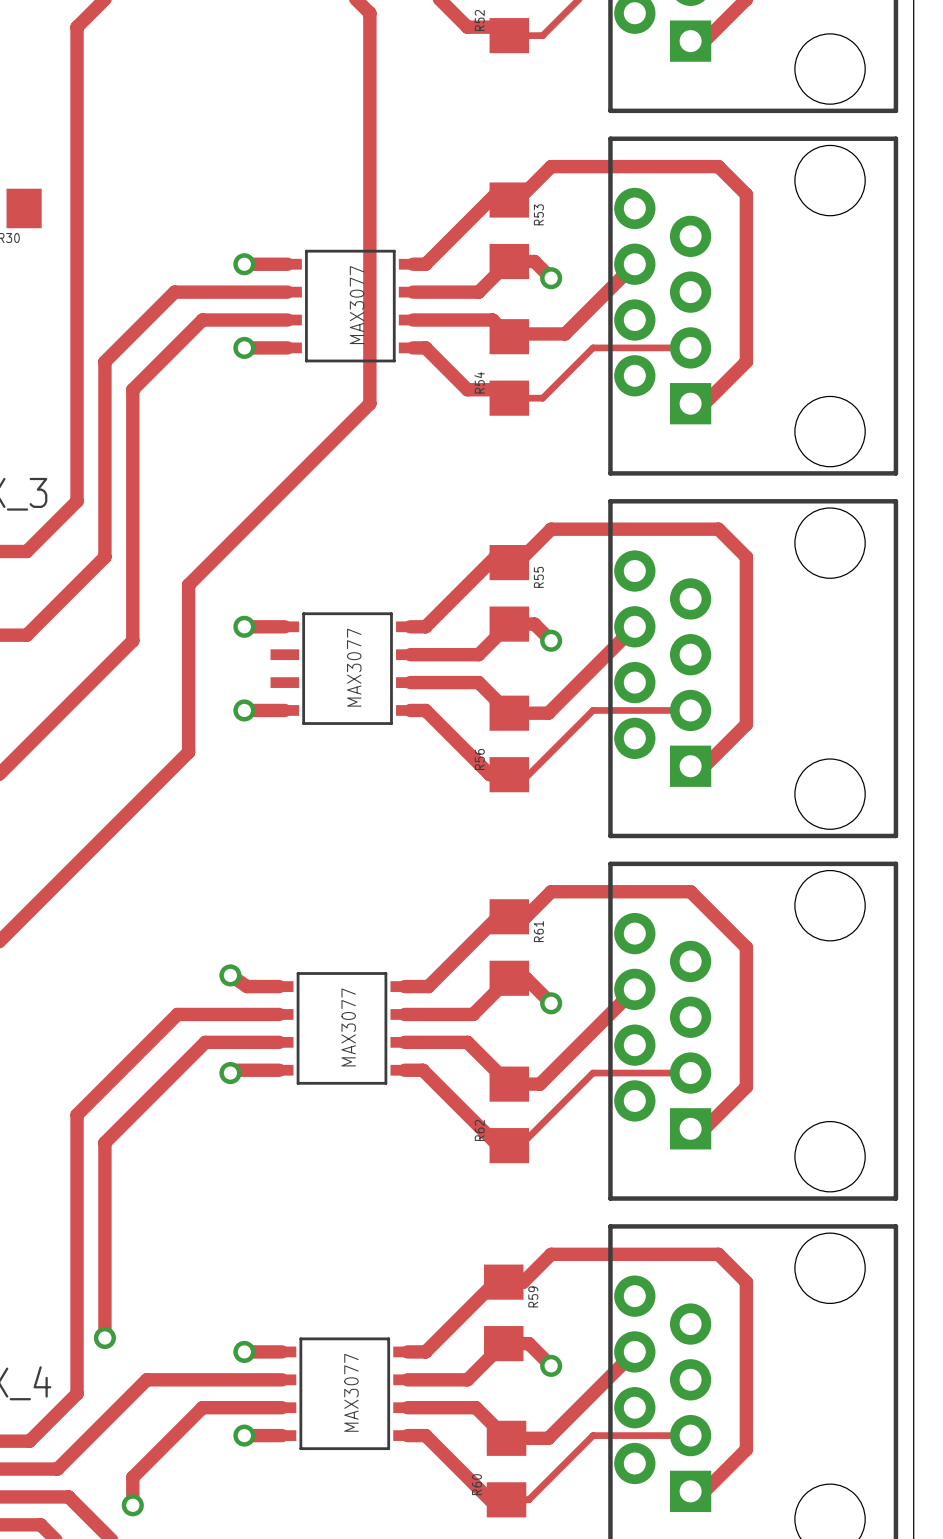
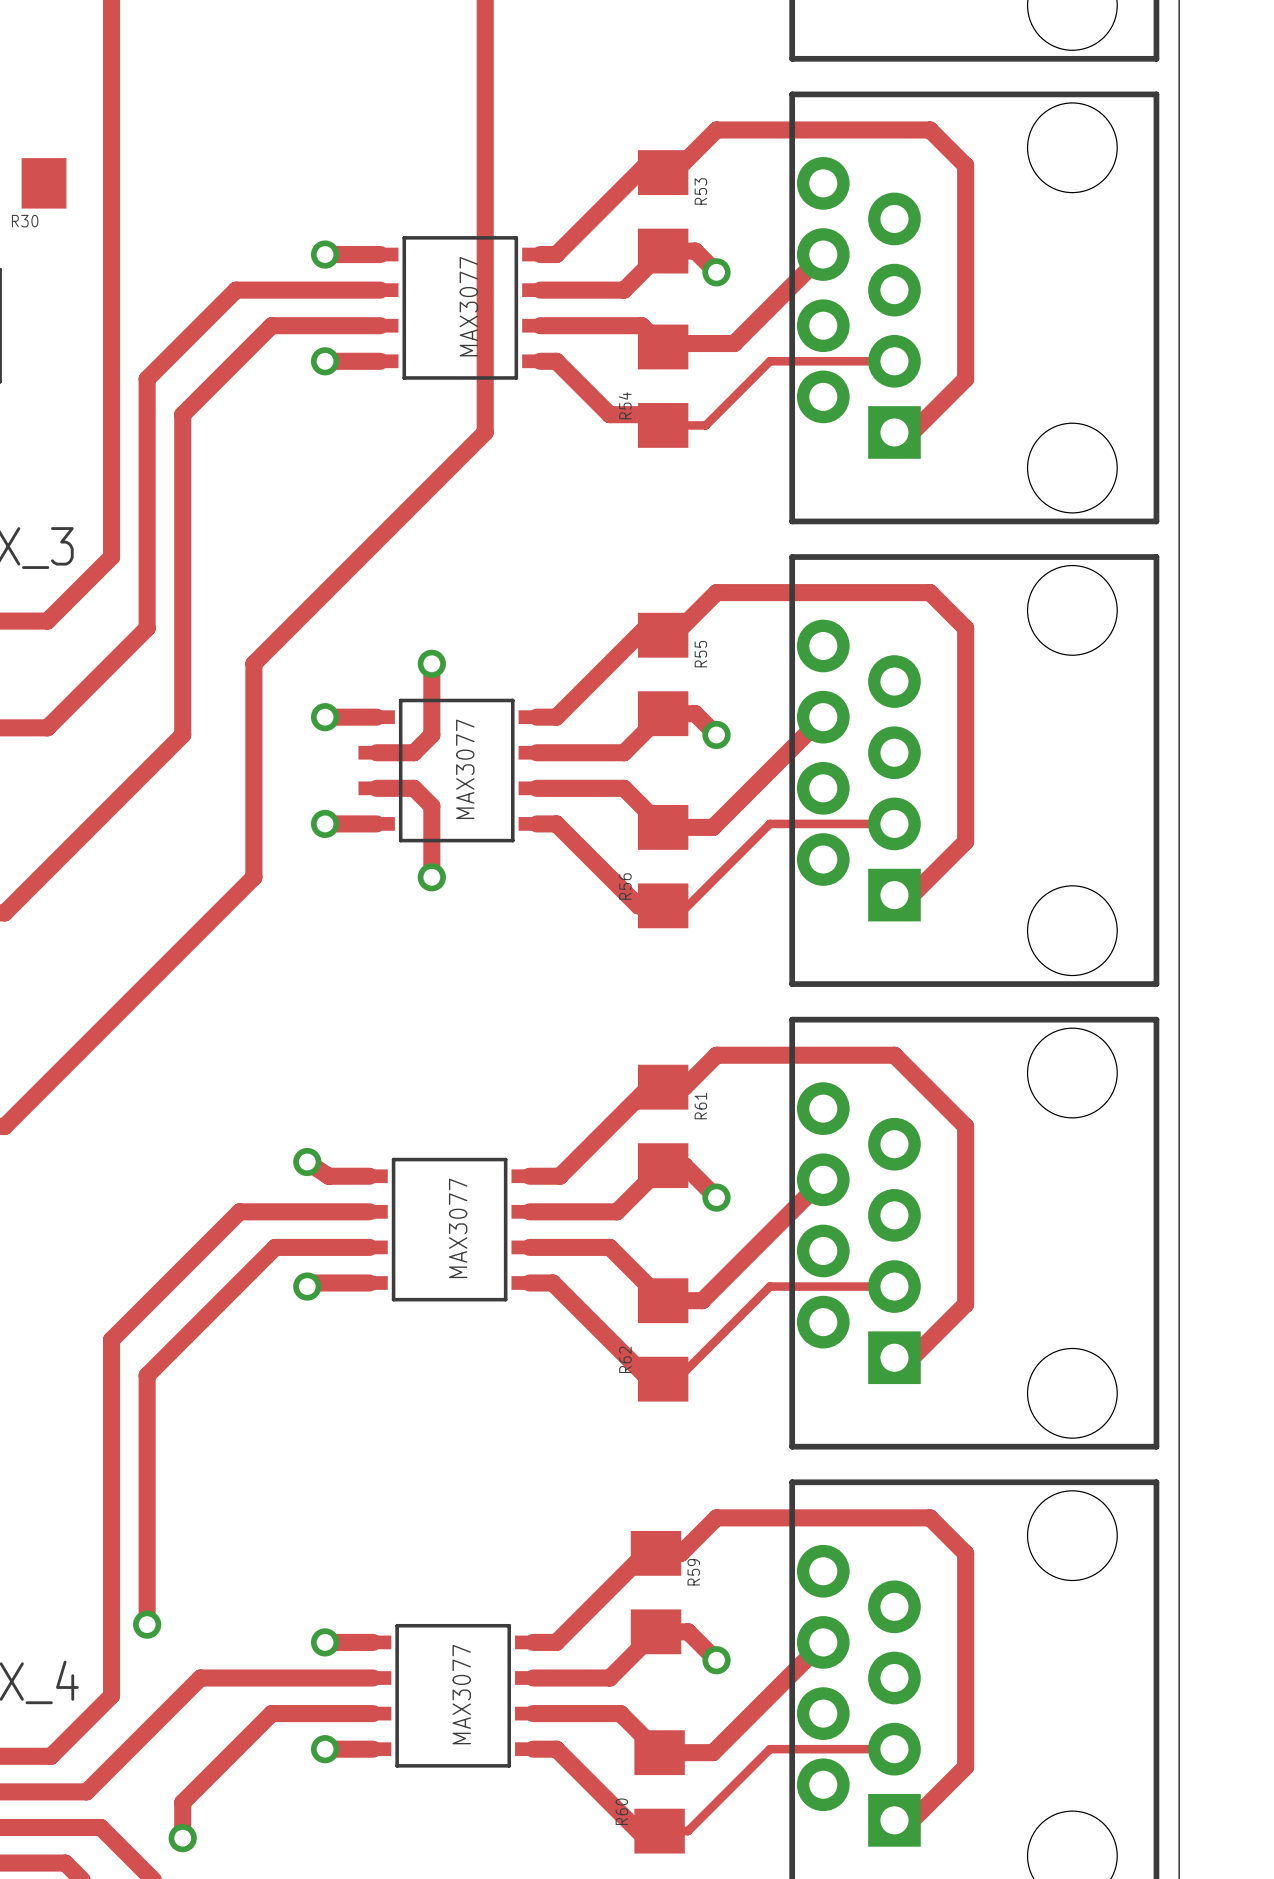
track: none -> (431, 663) (431, 734) (414, 752) (376, 752)
via: none -> (431, 663)
track: none -> (376, 788) (414, 788) (431, 806) (431, 877)
via: none -> (431, 877)

